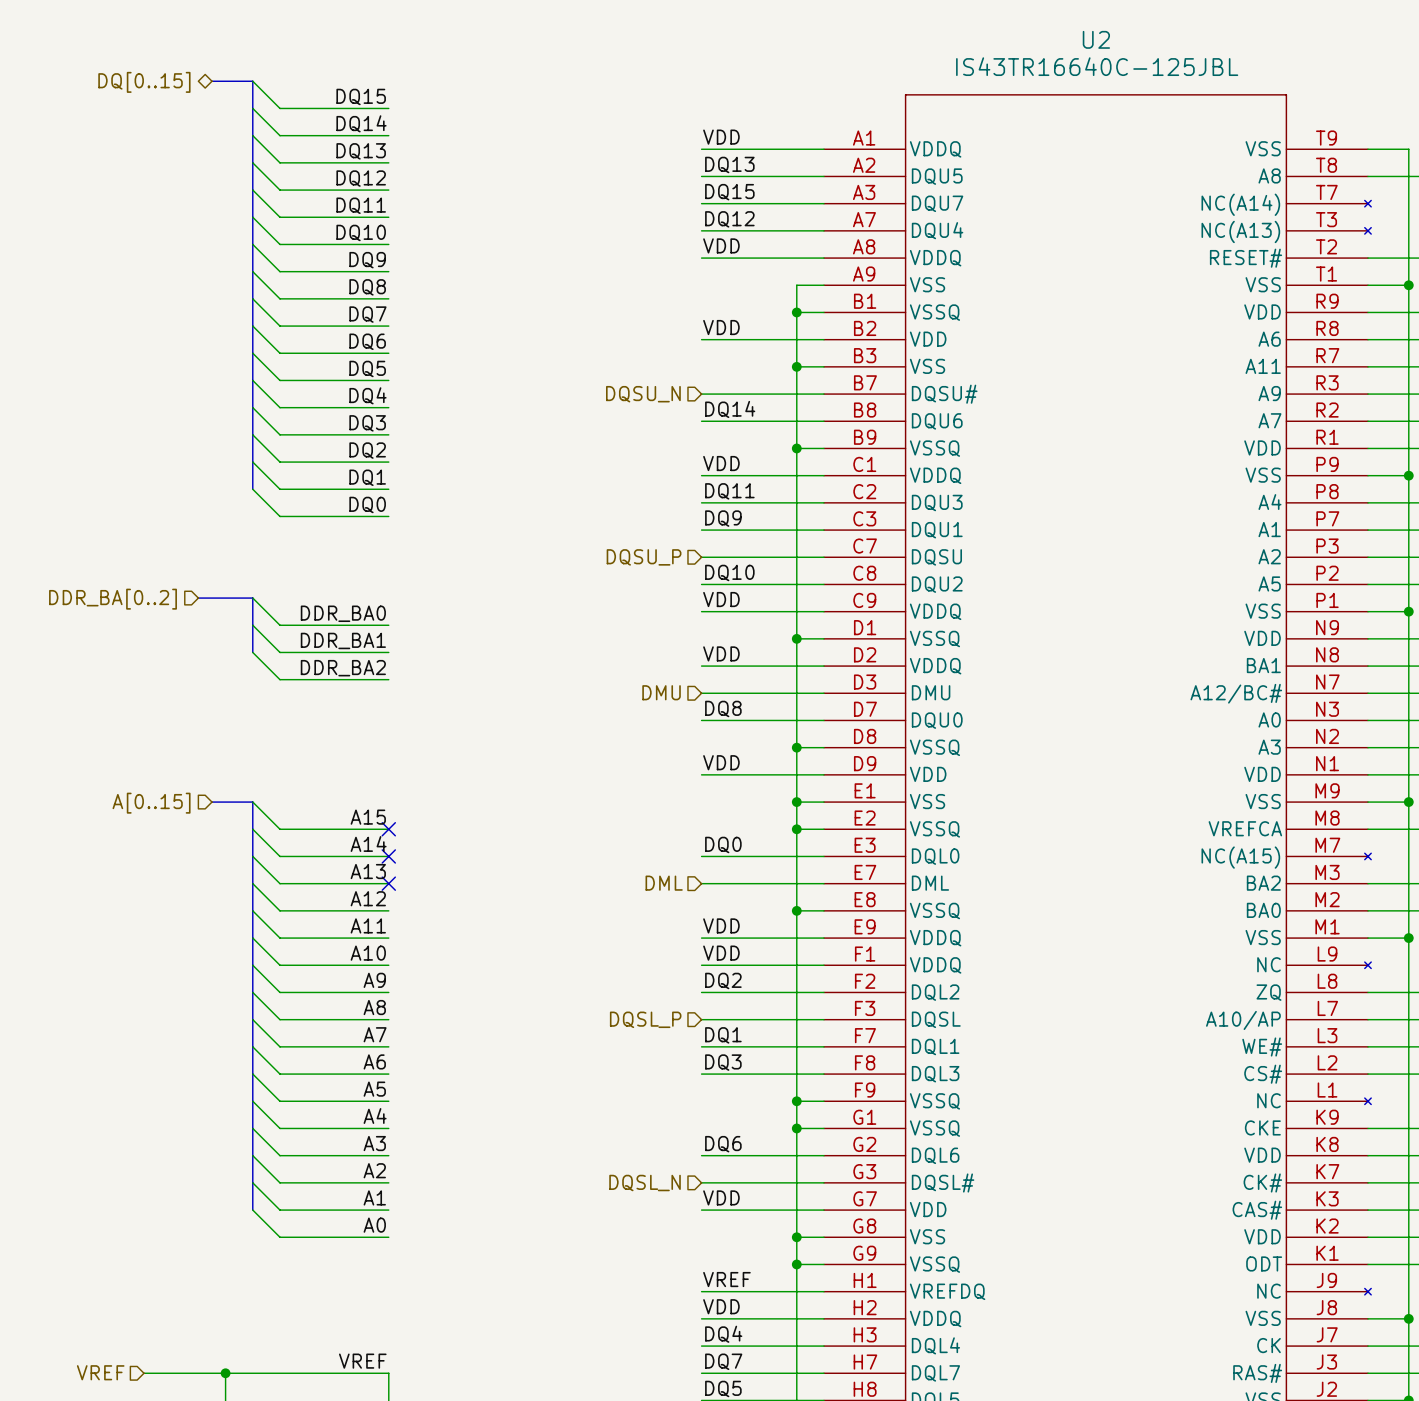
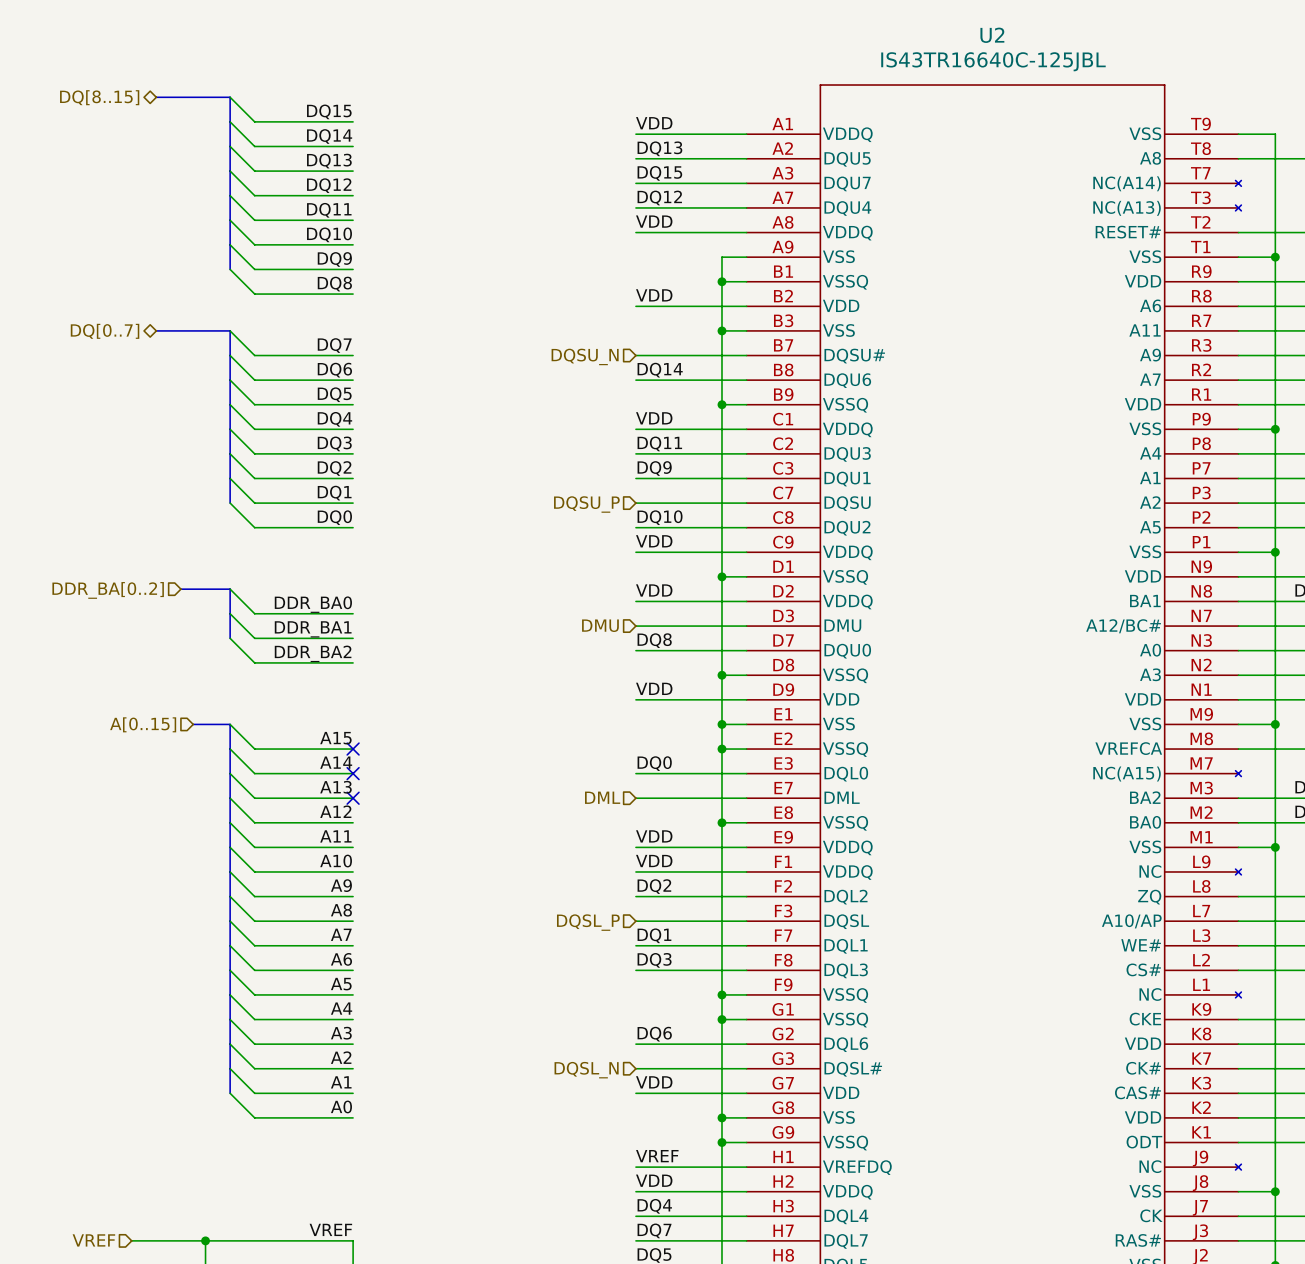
bus: (211, 81) (252, 81) (252, 108) -> (156, 97) (230, 97)
wire: (252, 81) (279, 108) (388, 108) -> none
hierarchical label: DQ[0..15] (144, 82) -> DQ[8..15] (99, 97)
label: DQ15 (361, 96) -> none
label: DQ14 (361, 123) -> DQ15 (329, 111)
label: DQ13 (361, 151) -> DQ14 (329, 136)
label: DQ12 (361, 178) -> DQ13 (329, 161)
label: DQ11 (361, 205) -> DQ12 (329, 185)
label: DQ10 (361, 232) -> DQ11 (329, 210)
label: DQ9 (367, 260) -> DQ10 (329, 234)
label: DQ8 (367, 287) -> DQ9 (334, 259)
bus: (252, 298) (252, 366) -> (156, 330) (230, 330)
label: DQ7 (367, 314) -> DQ8 (334, 284)
wire: (252, 326) (279, 353) (388, 353) -> (230, 330) (254, 355) (353, 355)
label position: DQ6 (367, 341) -> DQ6 (334, 370)
wire: (252, 353) (279, 380) (388, 380) -> (230, 355) (254, 380) (353, 380)
hierarchical label: none -> DQ[0..7] (105, 331)
label position: DQ5 (367, 368) -> DQ5 (334, 394)
wire: (252, 380) (279, 407) (388, 407) -> (230, 380) (254, 404) (353, 404)
label: none -> DQ7 (334, 345)
label position: DQ4 (367, 395) -> DQ4 (334, 419)
wire: (252, 407) (279, 434) (388, 434) -> (230, 404) (254, 429) (353, 429)
label position: DQ3 (367, 423) -> DQ3 (334, 443)
wire: (252, 434) (279, 462) (388, 462) -> (230, 429) (254, 453) (353, 453)
label position: DQ2 (367, 450) -> DQ2 (334, 468)
wire: (252, 462) (279, 489) (388, 489) -> (230, 453) (254, 478) (353, 478)
label position: DQ1 (367, 477) -> DQ1 (334, 493)
wire: (252, 489) (279, 516) (388, 516) -> (230, 478) (254, 503) (353, 503)
bus: none -> (230, 441) (230, 503)
label position: DQ0 (367, 504) -> DQ0 (334, 517)
bus: (198, 598) (252, 598) (252, 652) -> (180, 589) (230, 589) (230, 638)
wire: (252, 598) (279, 625) (388, 625) -> (230, 503) (254, 527) (353, 527)
hierarchical label position: DDR_BA[0..2] (113, 599) -> DDR_BA[0..2] (108, 590)
label: DDR_BA0 (343, 613) -> none
wire: (252, 625) (279, 652) (388, 652) -> (230, 638) (254, 662) (353, 662)
label position: DDR_BA1 (343, 640) -> DDR_BA1 (313, 629)
label: DDR_BA2 (343, 668) -> DDR_BA0 (313, 604)
wire: none -> (230, 613) (254, 638) (353, 638)
label: none -> DDR_BA2 (313, 653)

